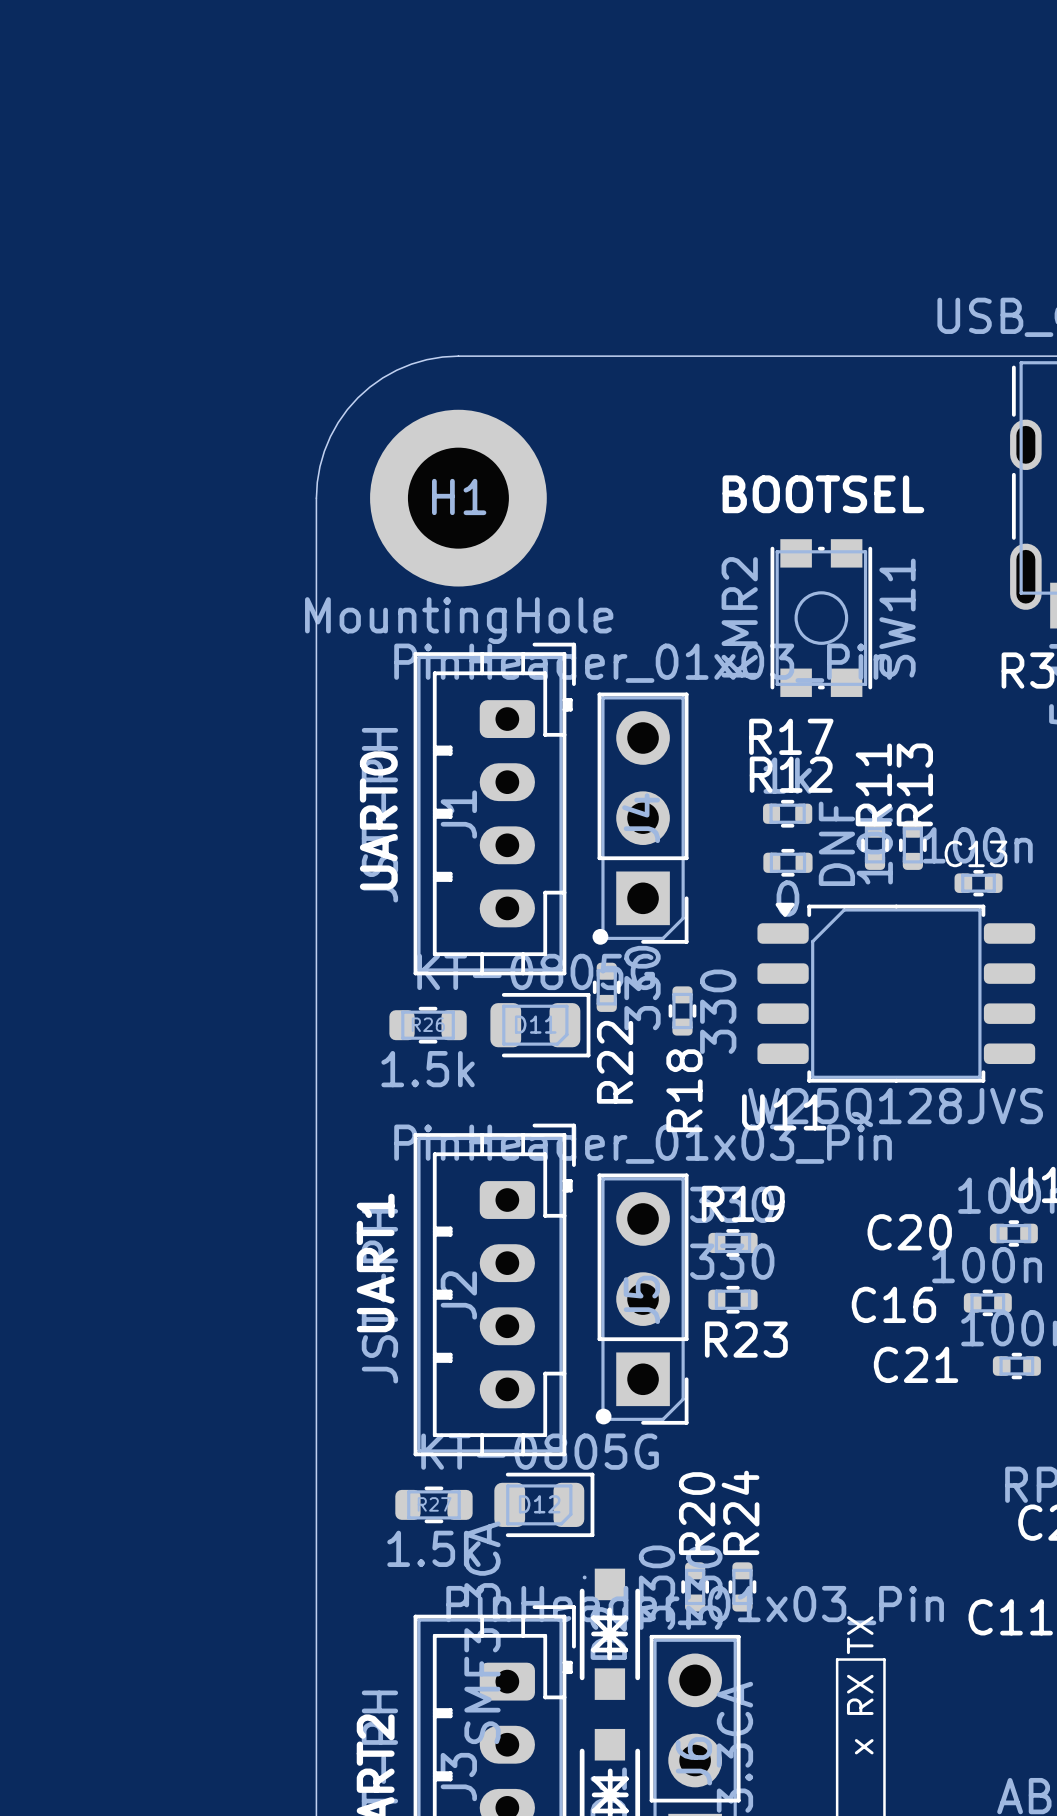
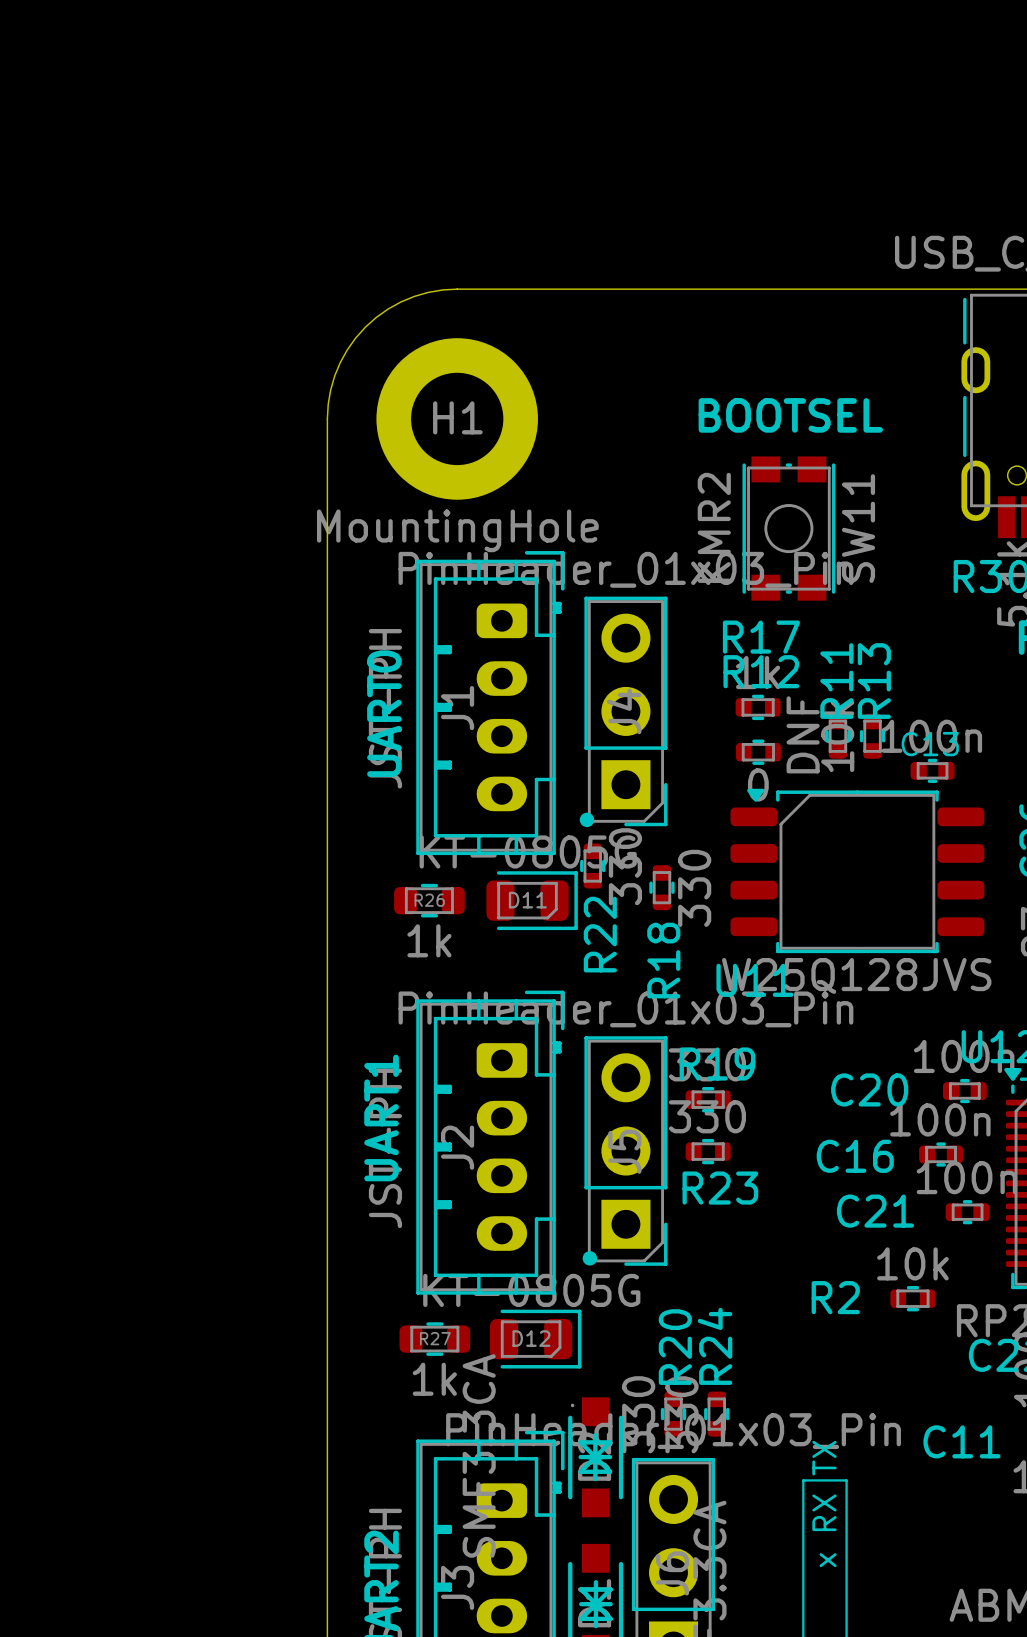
R26 value: 1.5k (428, 1069) -> 1k (429, 940)
R2: none -> 10k (912, 1298)
R27 value: 1.5k (433, 1548) -> 1k (434, 1379)

